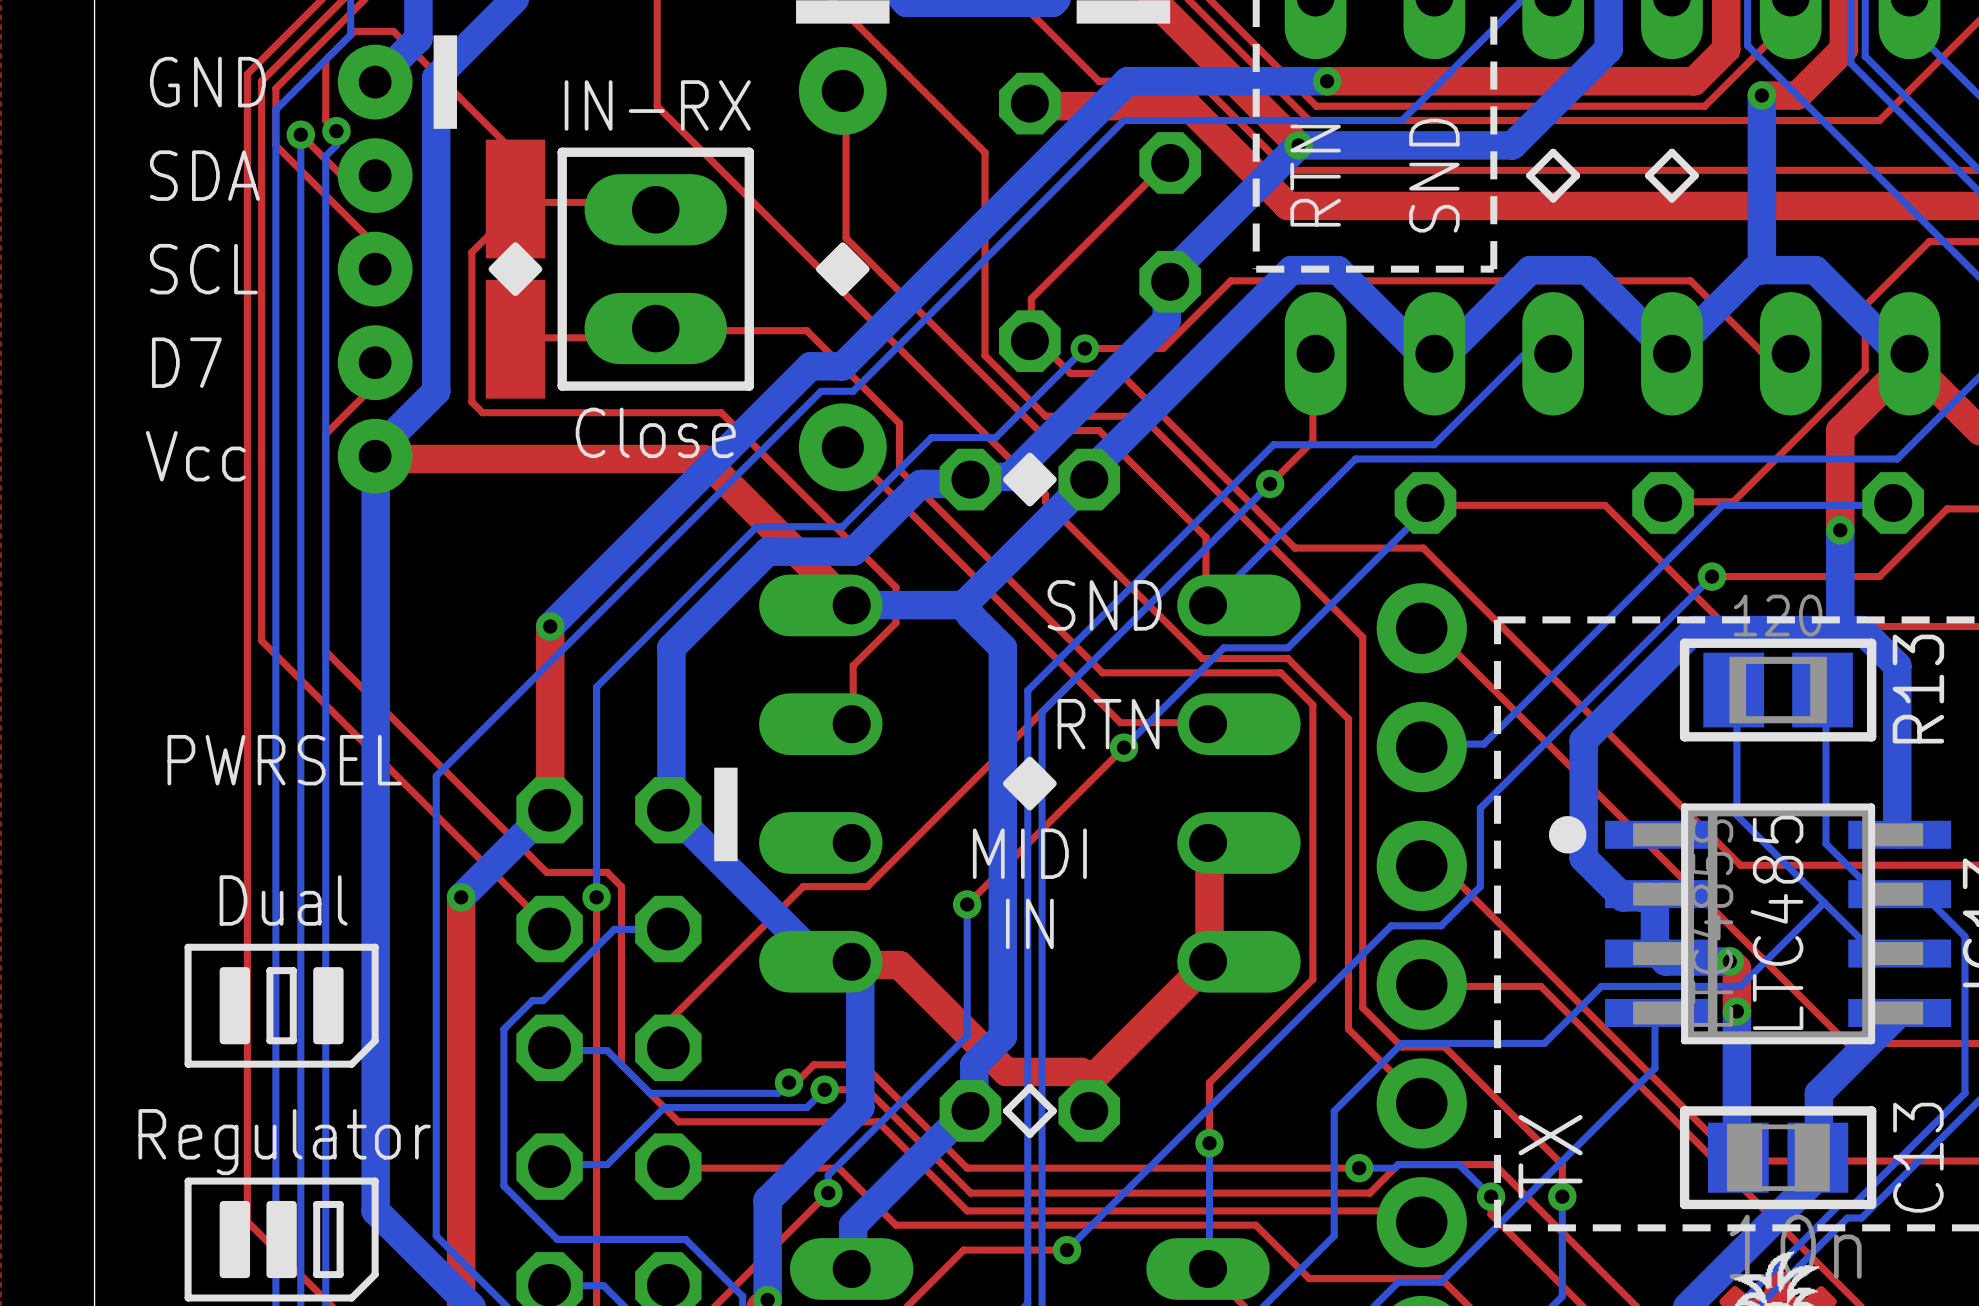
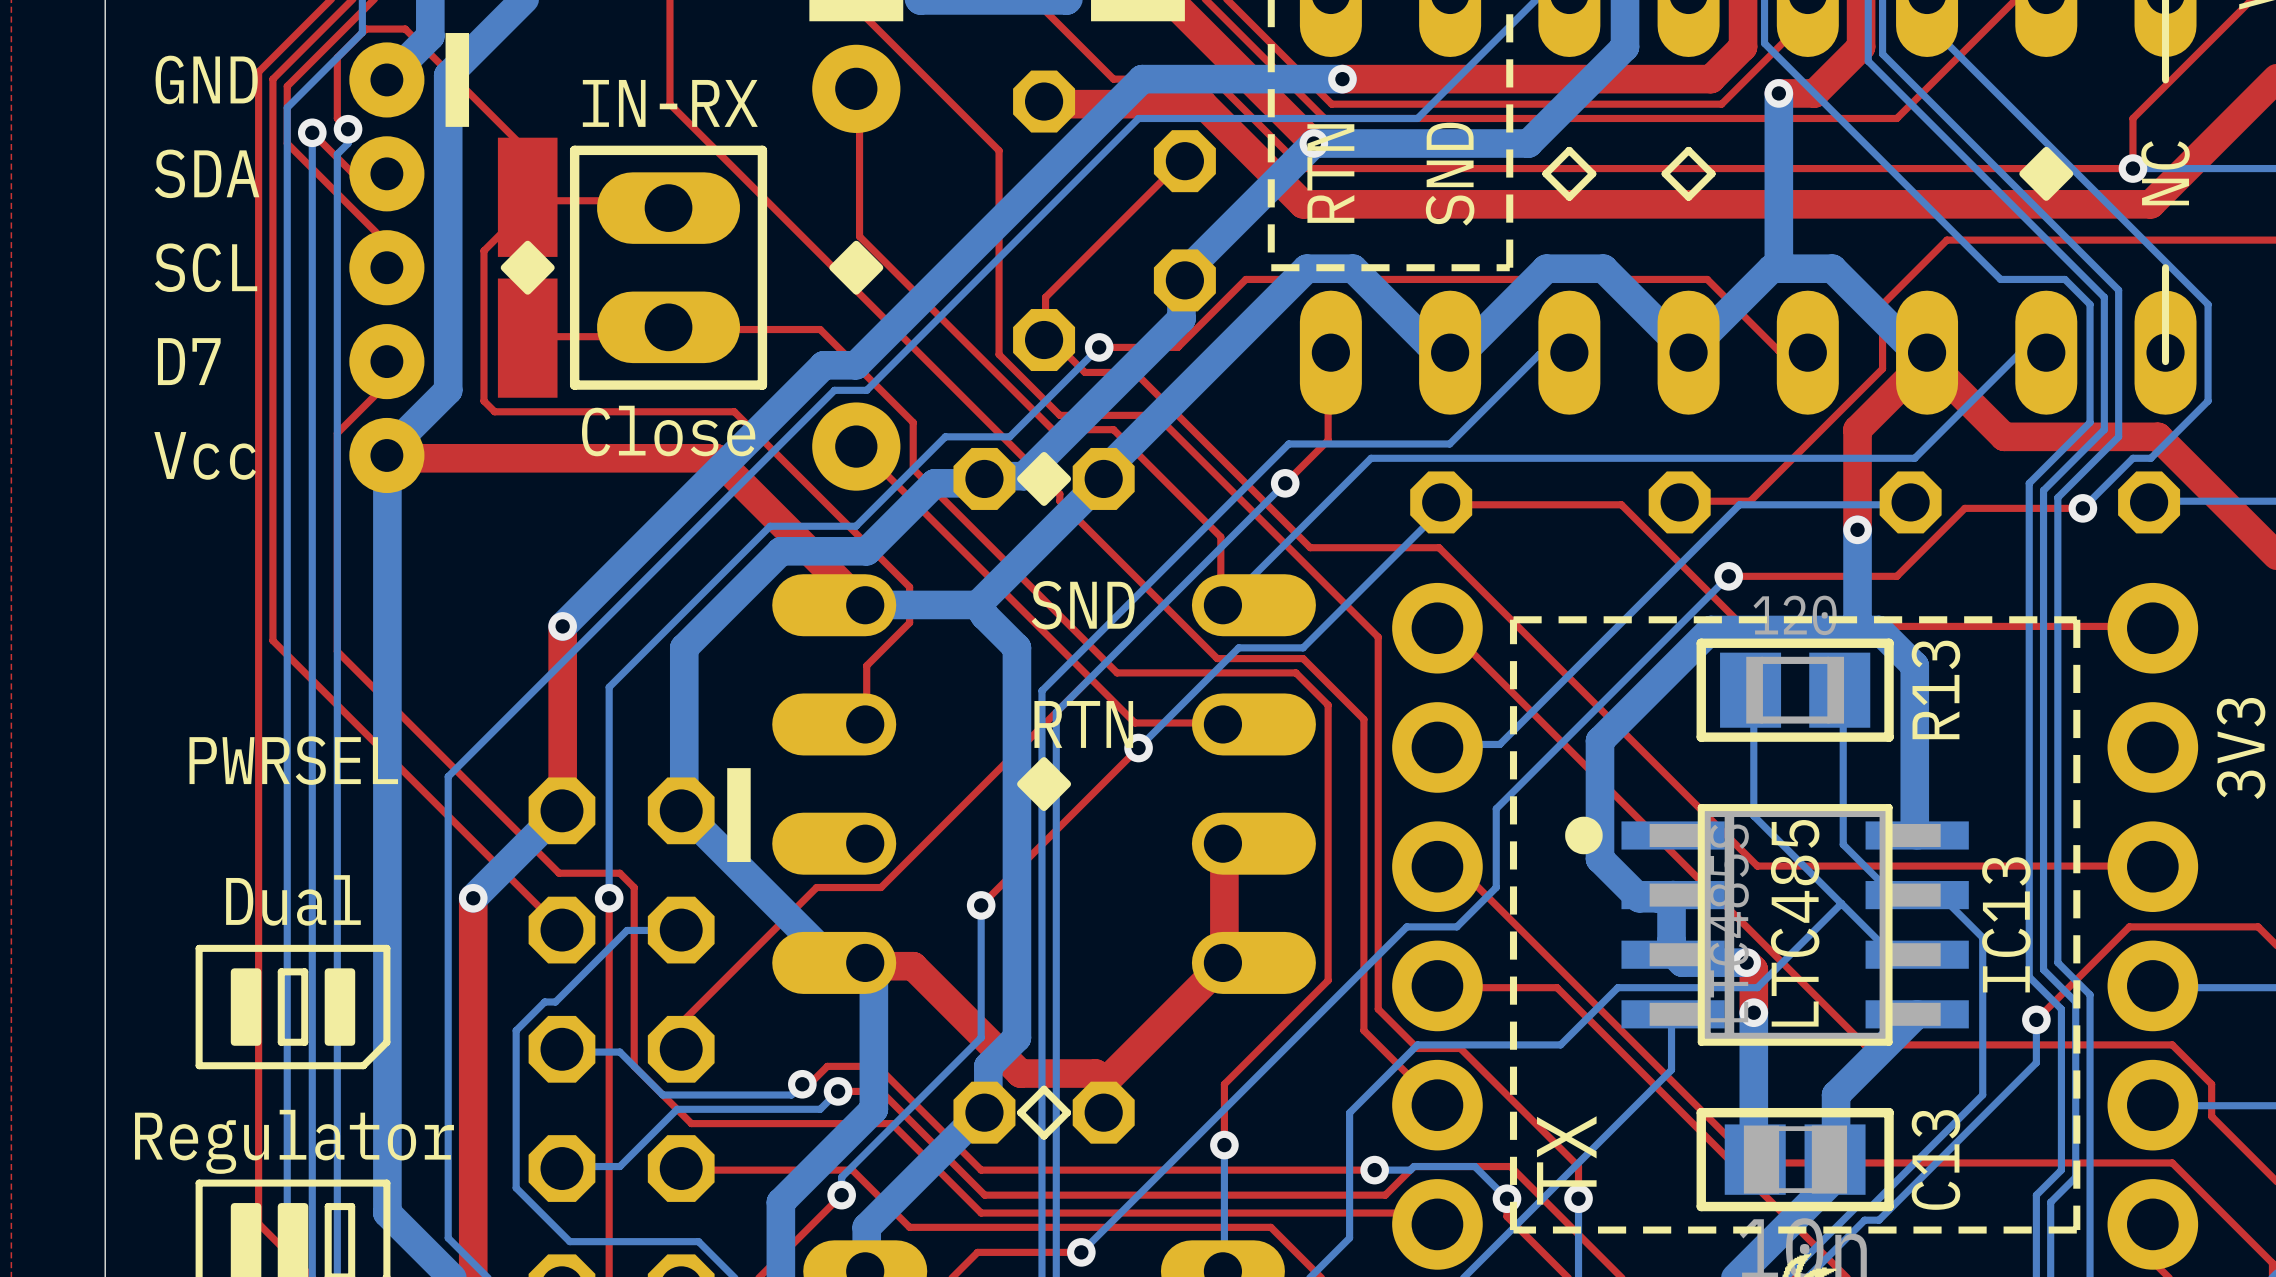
text position: SND (1104, 605) -> SND (1083, 605)
text position: RTN (1108, 724) -> RTN (1083, 724)
text: MIDI (1029, 853) -> none
text: IN (1029, 923) -> none

